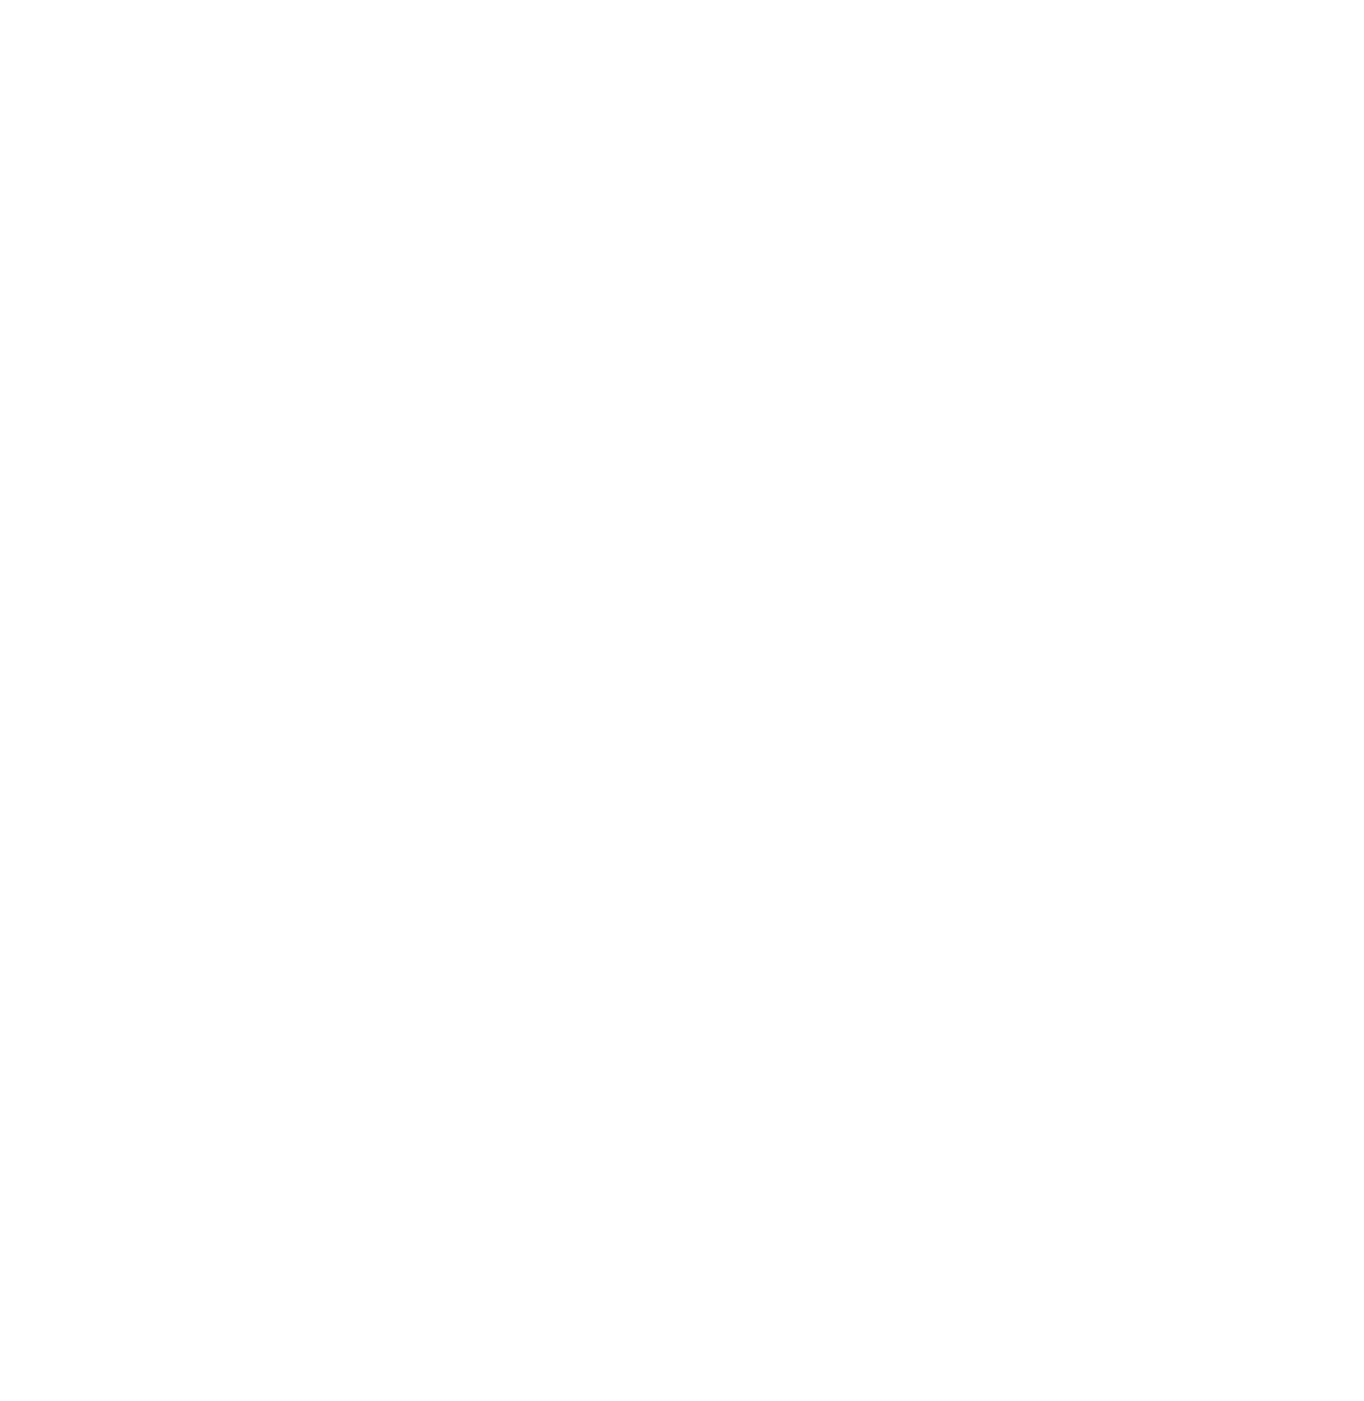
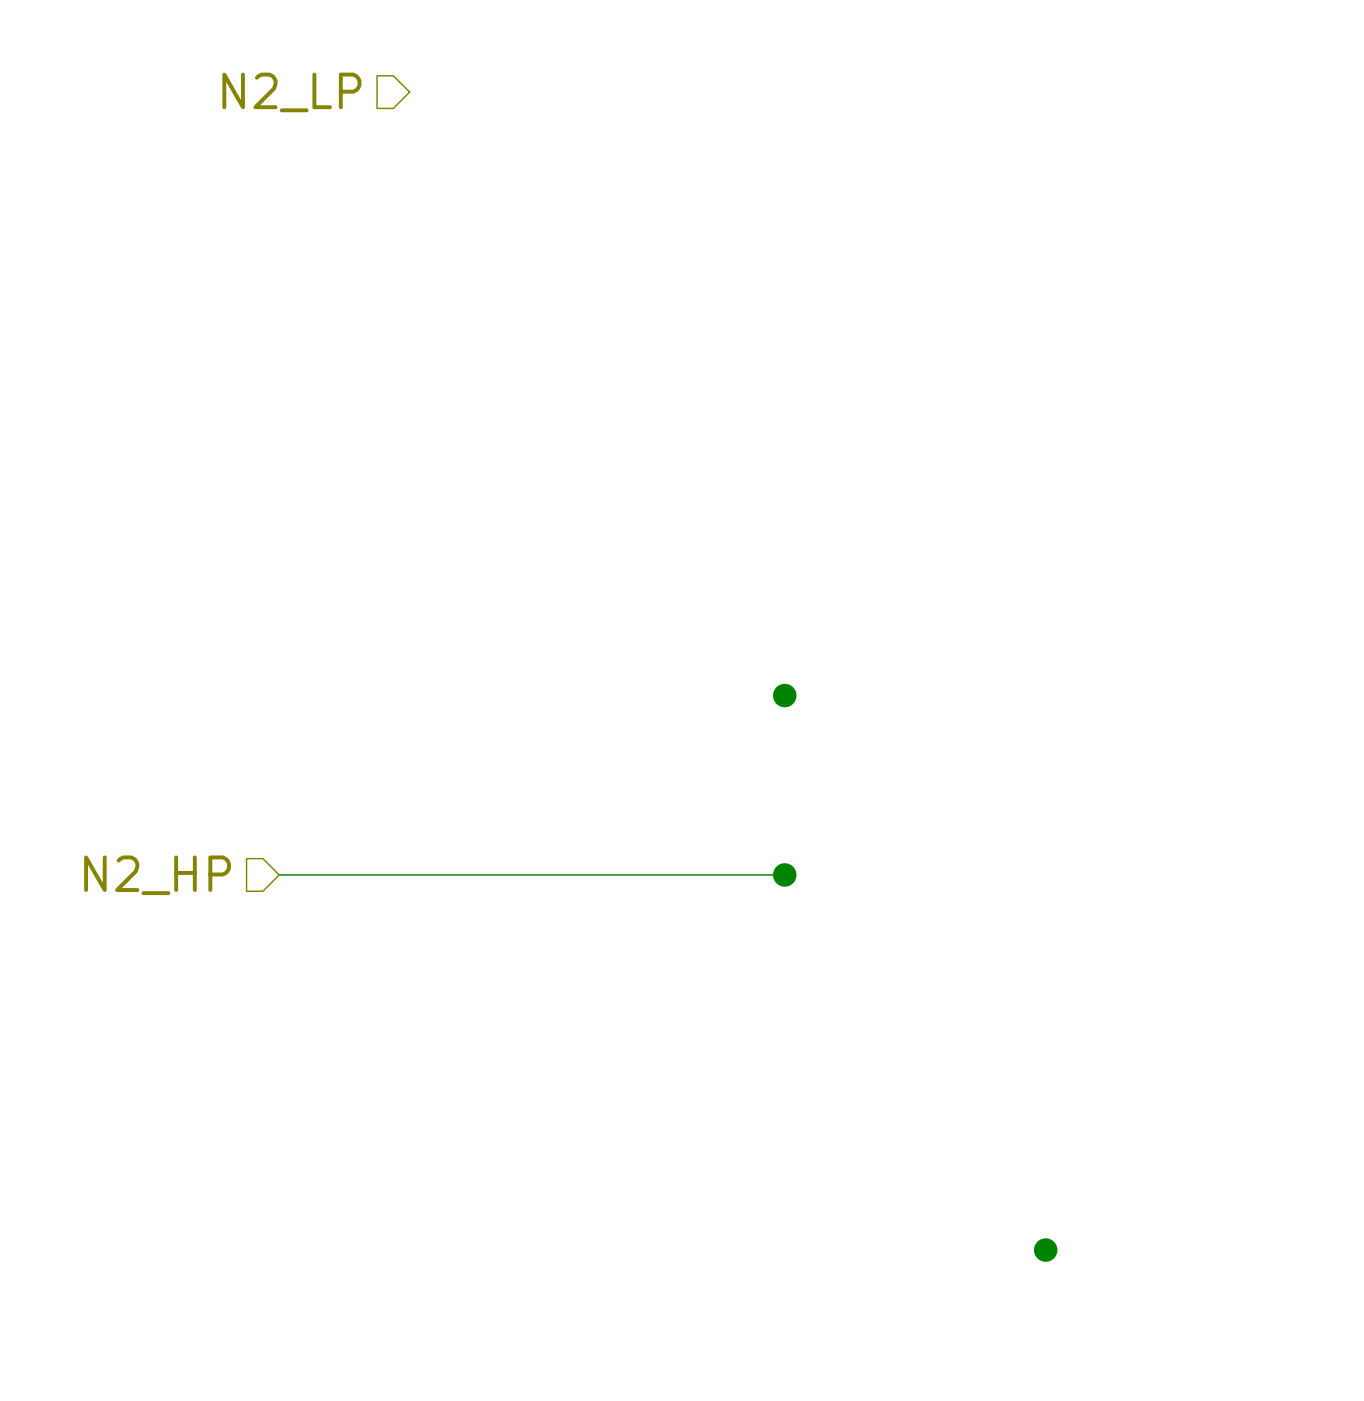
hierarchical label: none -> N2_LP (291, 92)
junction: none -> (784, 695)
wire: none -> (279, 874) (784, 874)
junction: none -> (784, 874)
hierarchical label: none -> N2_HP (157, 875)
junction: none -> (1045, 1250)

